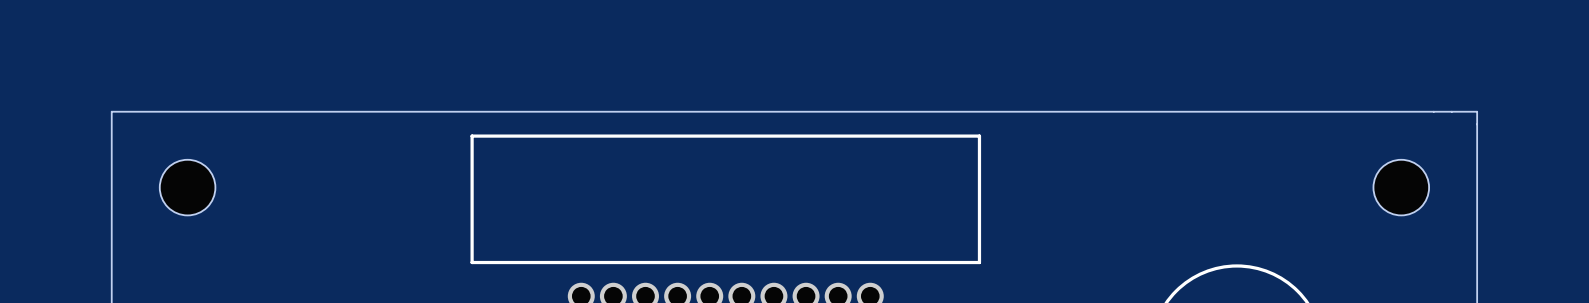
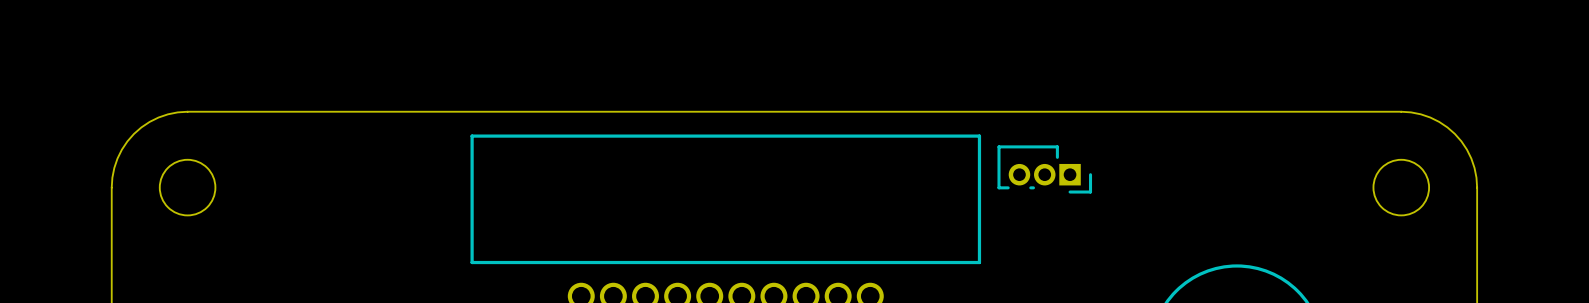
board edge: (187, 111) (111, 111) (111, 187) -> (187, 111) (158, 117) (133, 133) (117, 158) (111, 187)
board edge: (1401, 111) (1477, 111) (1477, 187) -> (1401, 111) (1430, 117) (1454, 133) (1471, 158) (1477, 187)
part: none -> (1044, 169)

